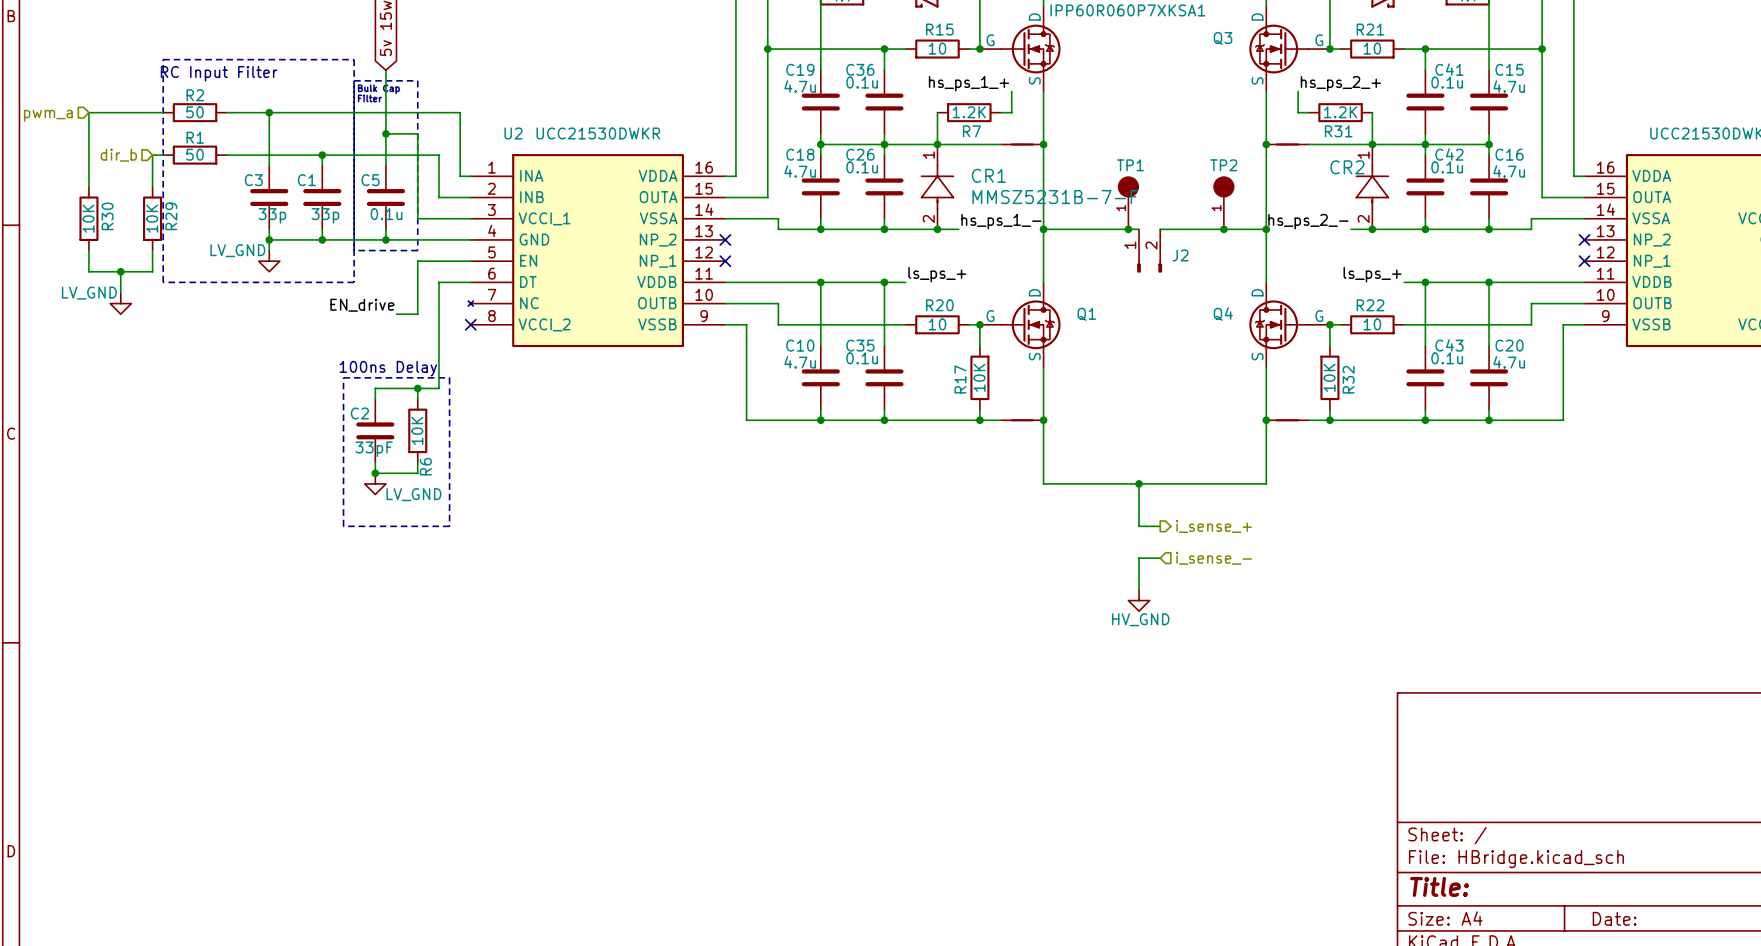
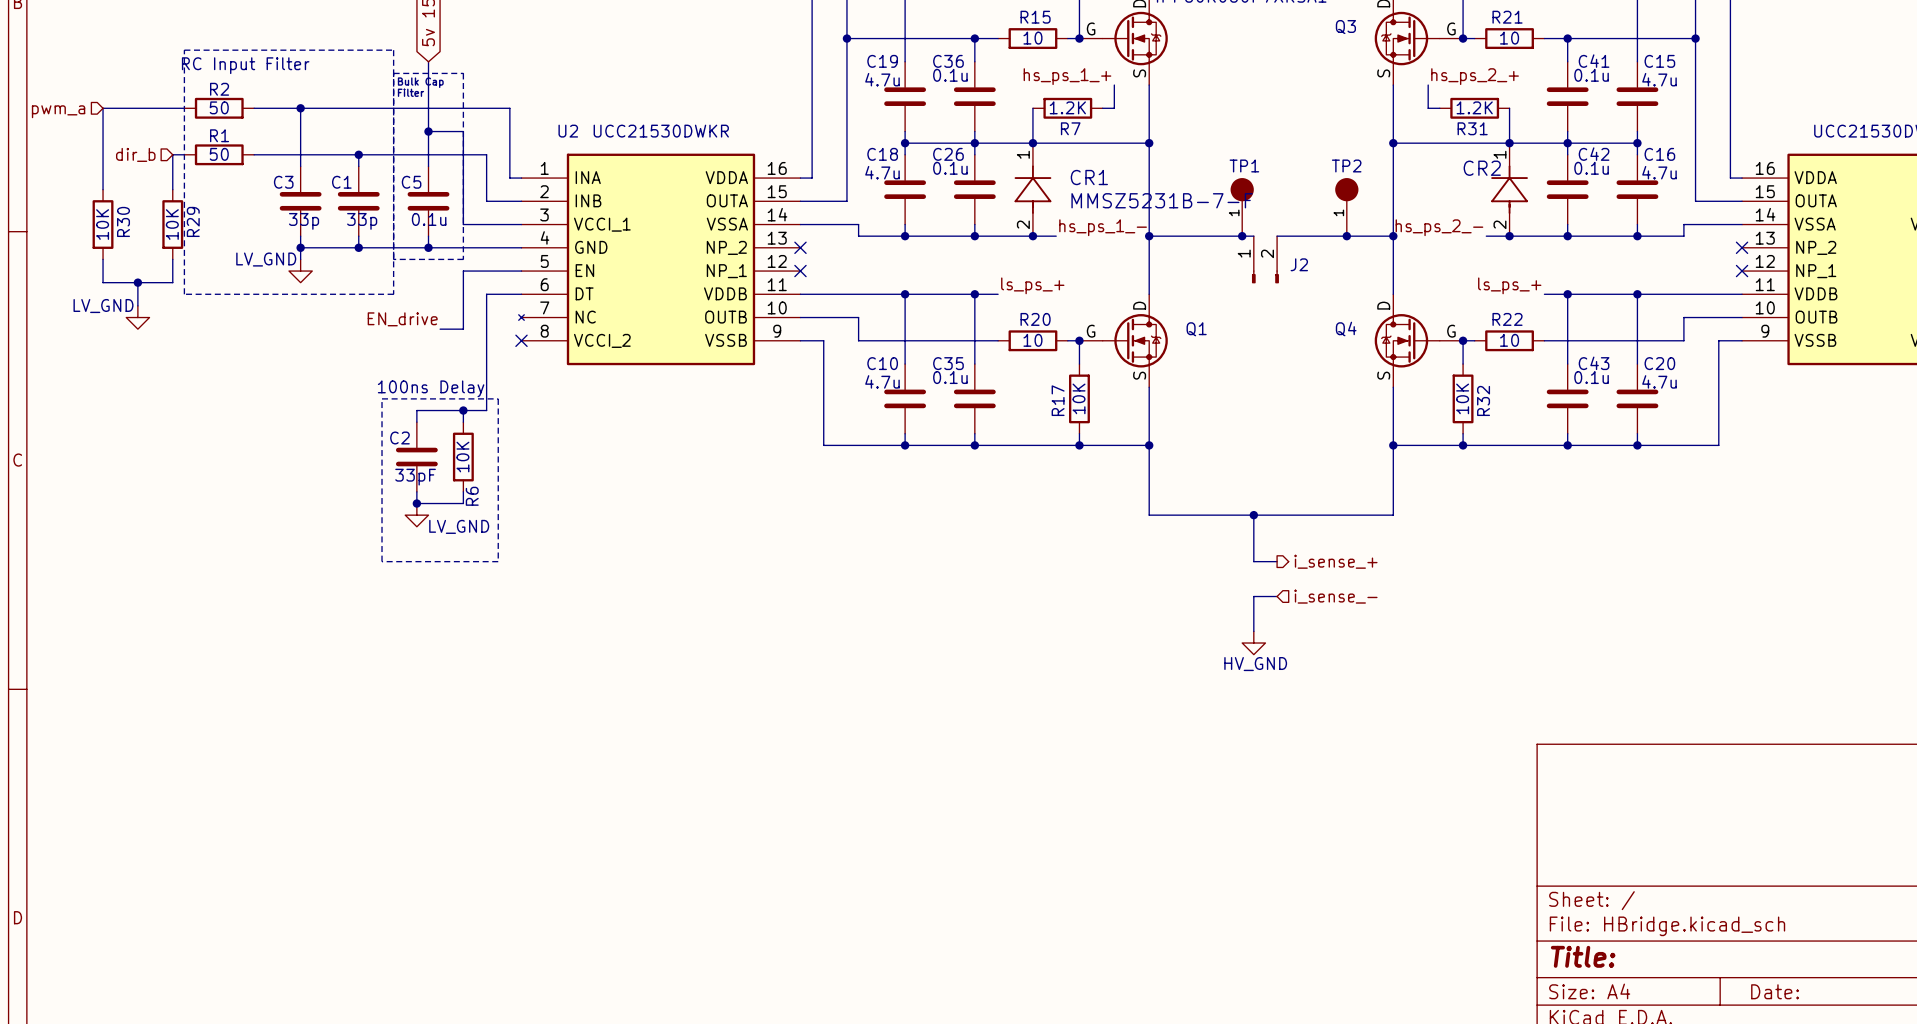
part: (1022, 144) -> none
part: (1287, 144) -> none
part: (1022, 420) -> none
part: (1287, 420) -> none

